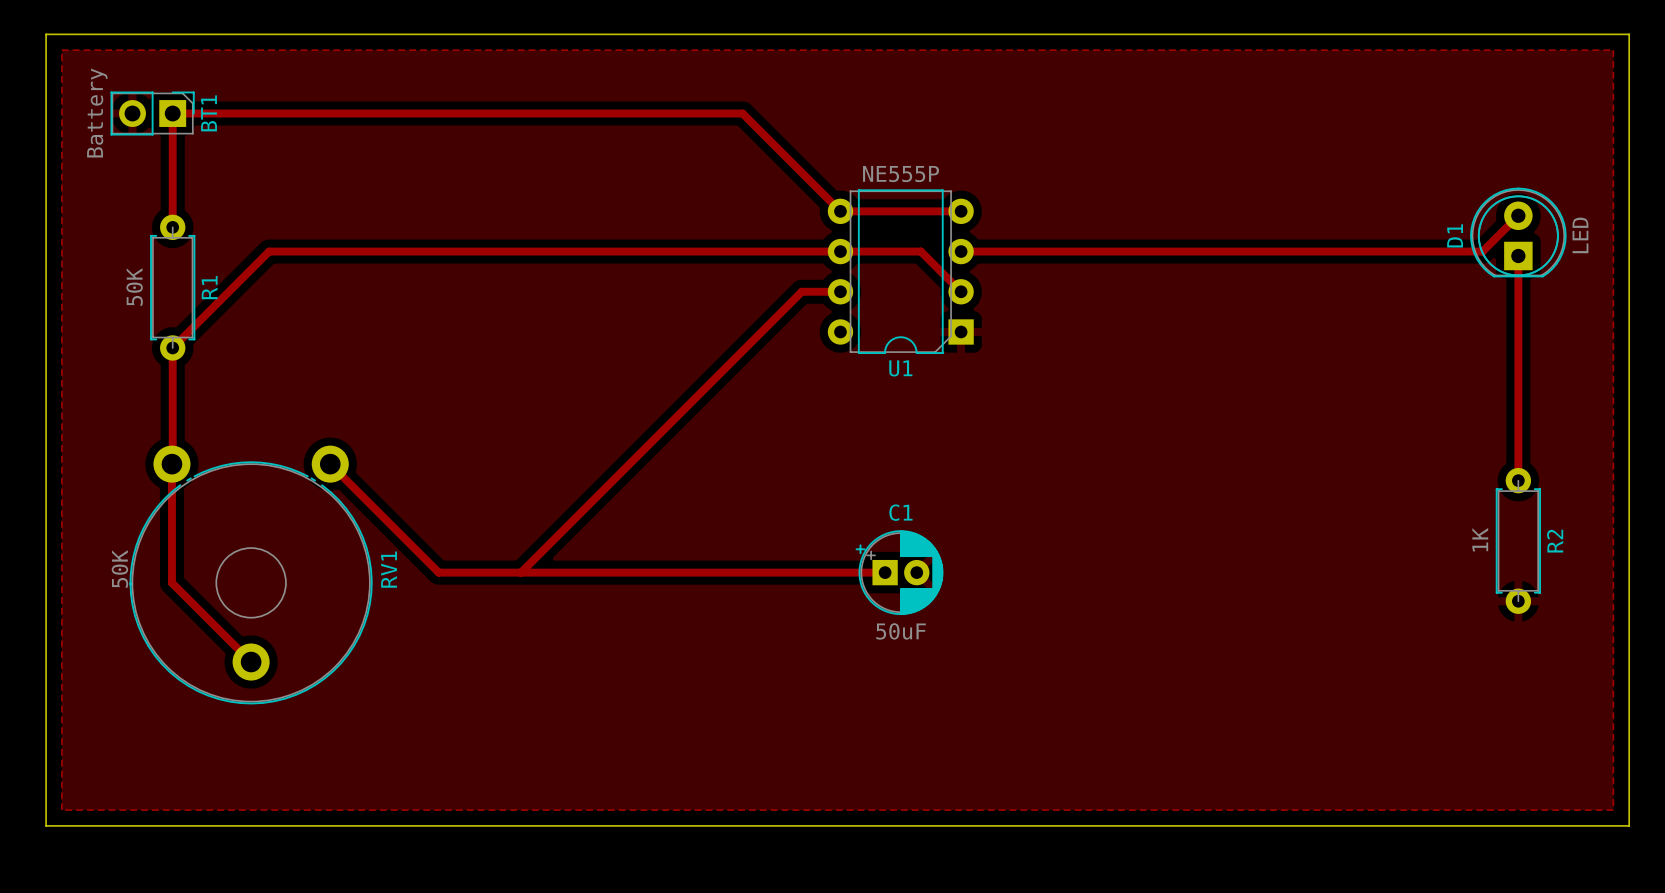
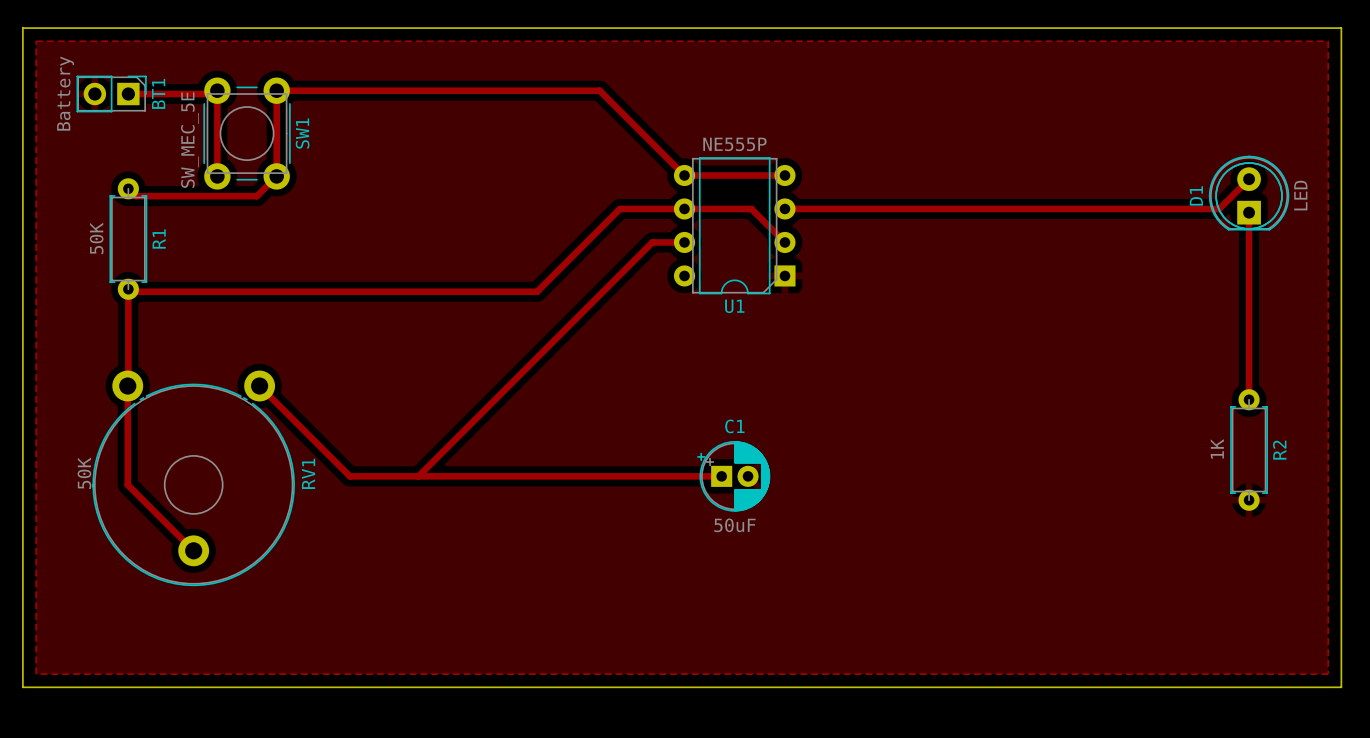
track: (172, 113) (172, 227) -> none
track: (275, 113) (742, 113) -> (128, 188) (135, 196) (256, 196) (276, 176) (276, 90) (599, 90) (603, 94)
track: none -> (214, 94) (217, 90) (217, 176)
SW1: none -> SW_MEC_5E (247, 133)
track: (762, 251) (269, 251) (172, 347) -> (619, 208) (537, 291) (130, 291) (128, 289)

